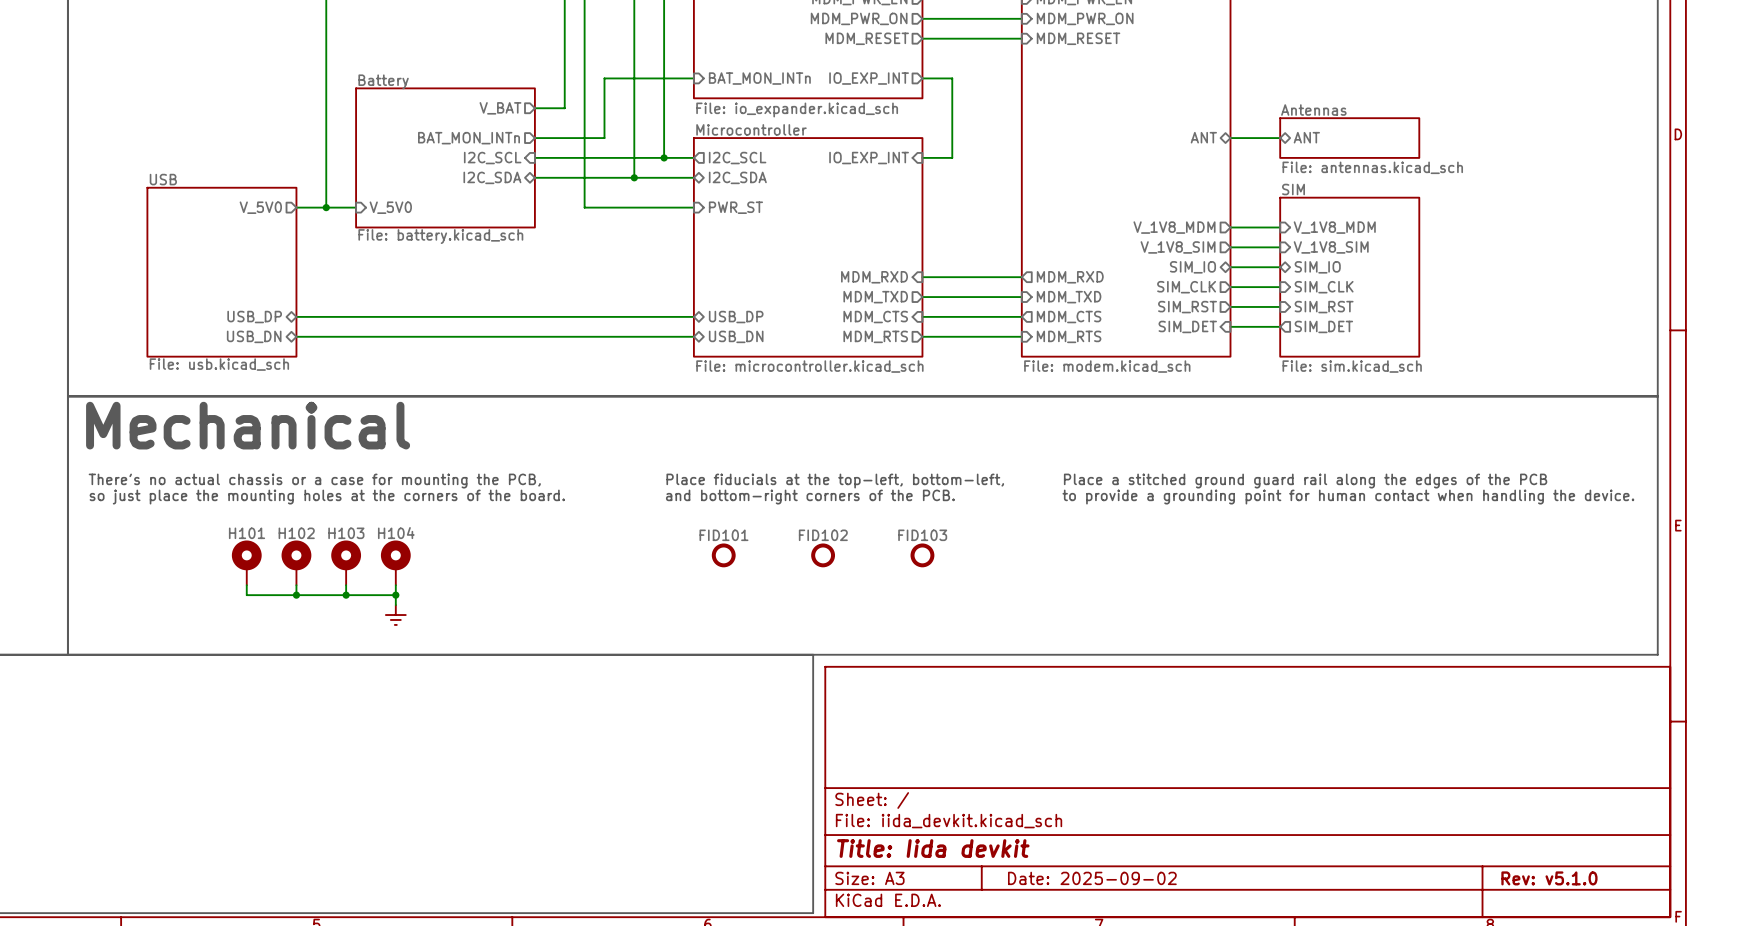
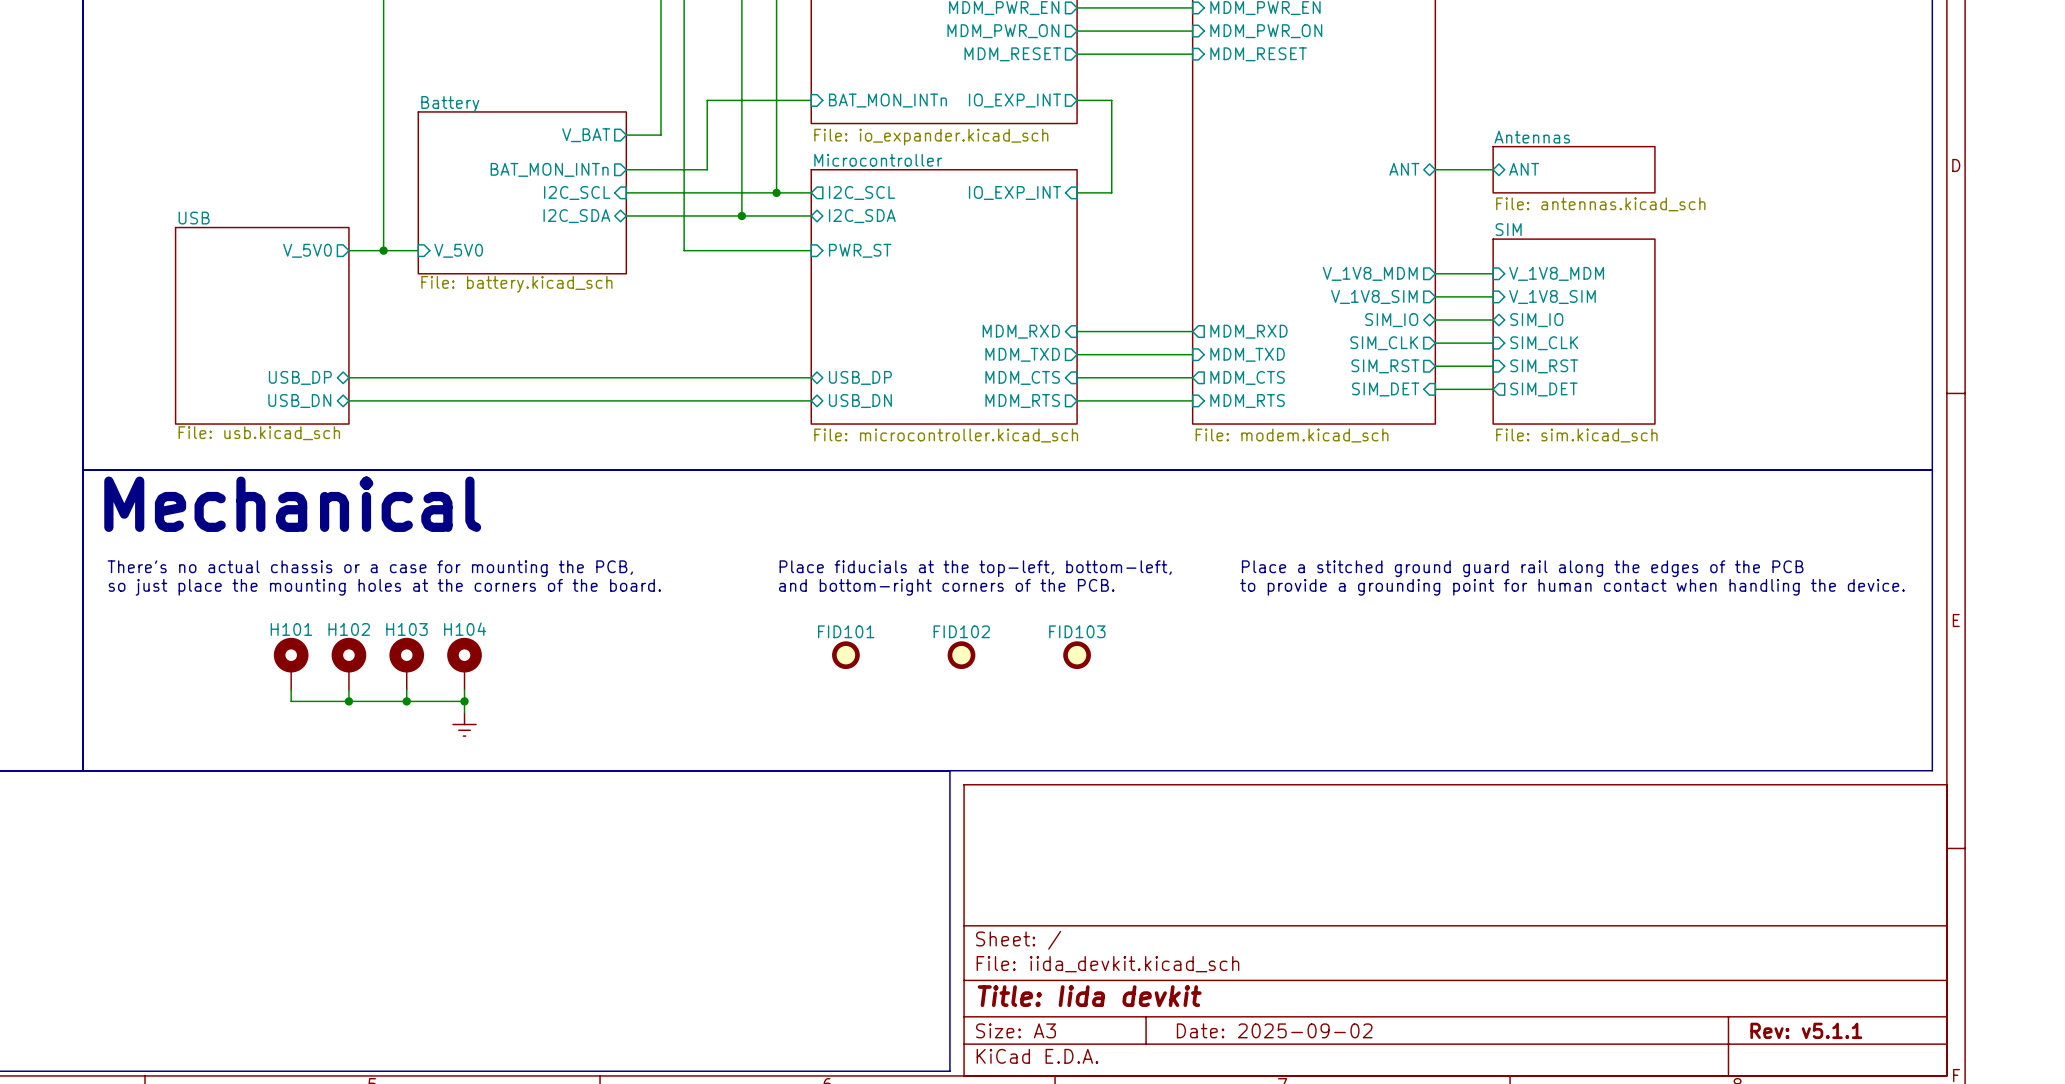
title block: Rev: v5.1.0 (1549, 878) -> Rev: v5.1.1 (1806, 1030)

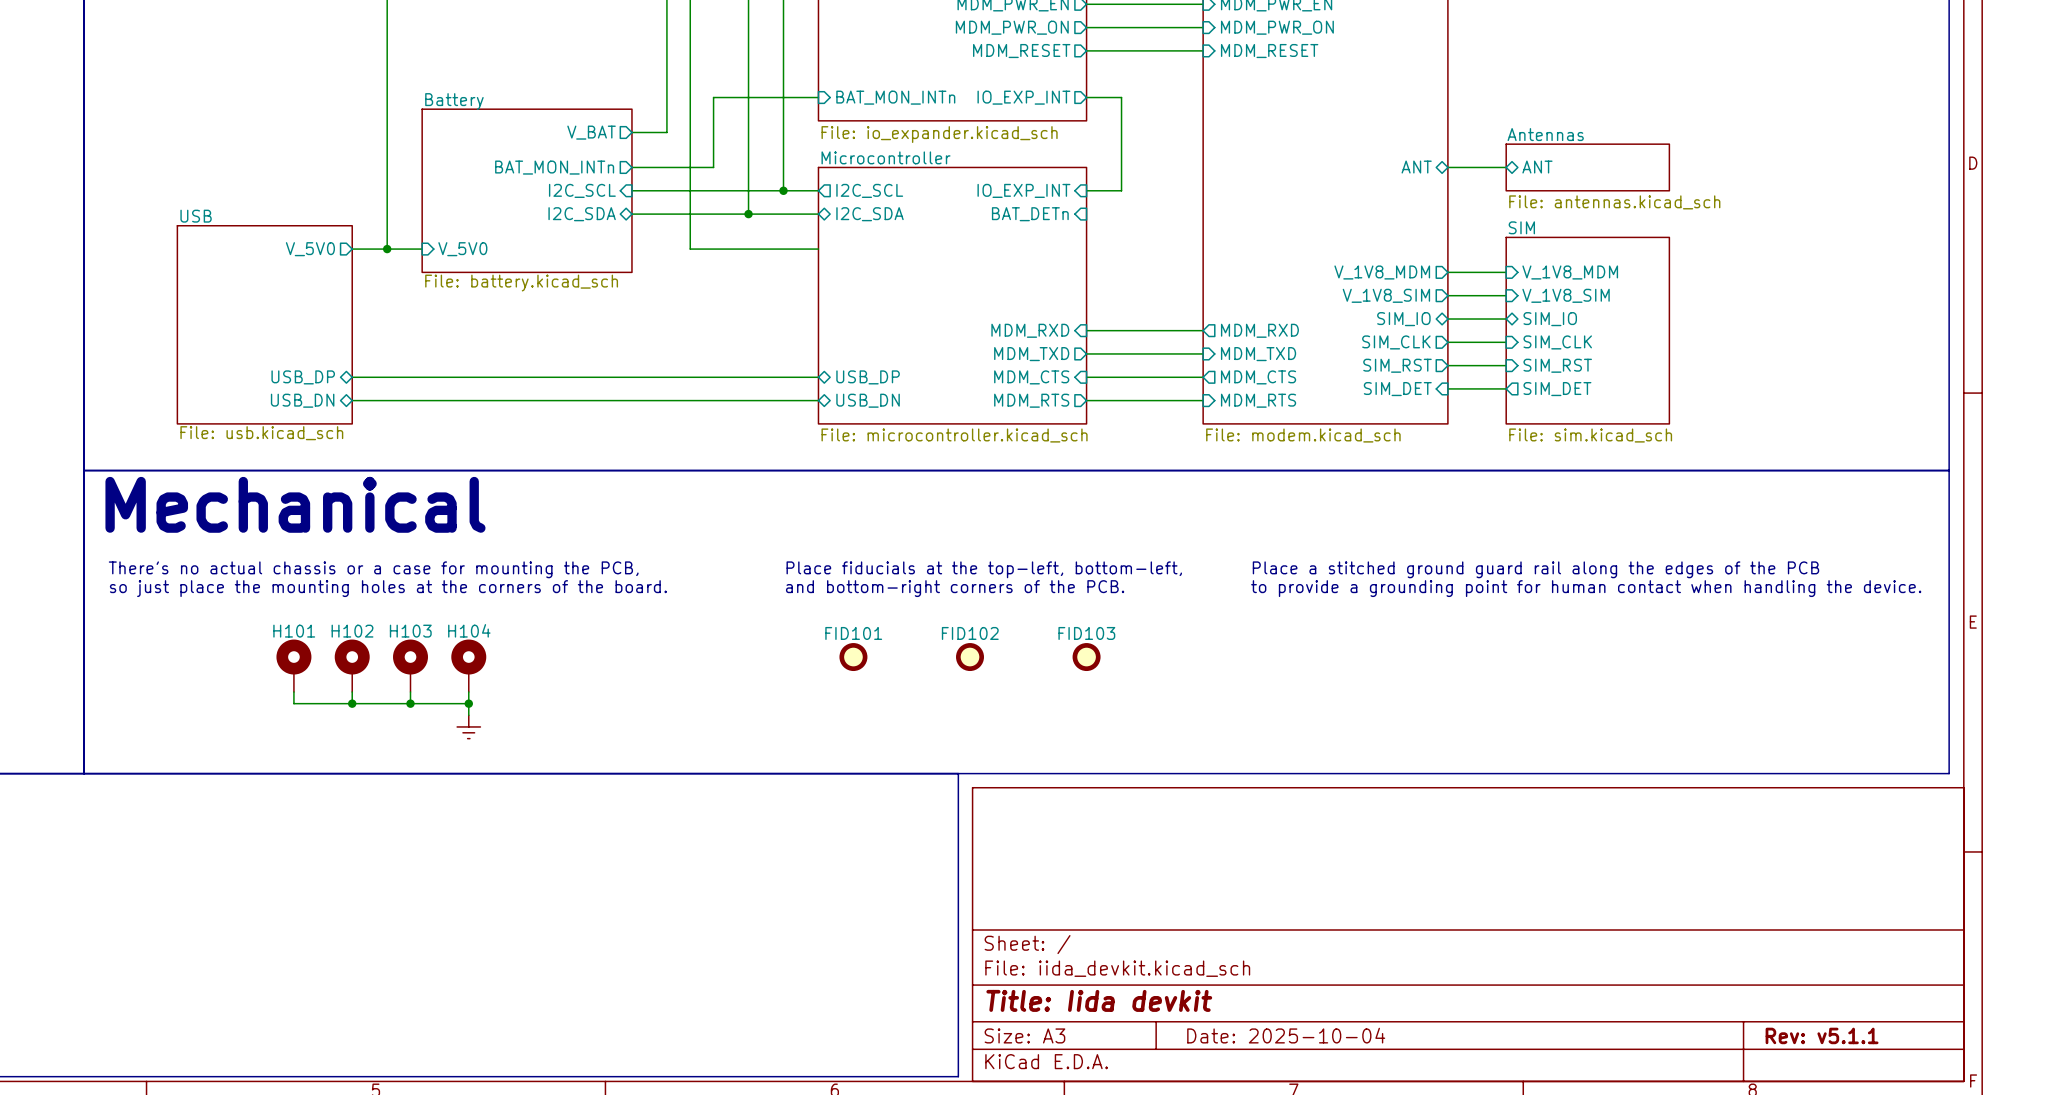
sheet pin: none -> BAT_DETn (1030, 214)
sheet pin: PWR_ST (860, 250) -> none
title block: Date: 2025-09-02 (1274, 1030) -> Date: 2025-10-04 (1286, 1035)

